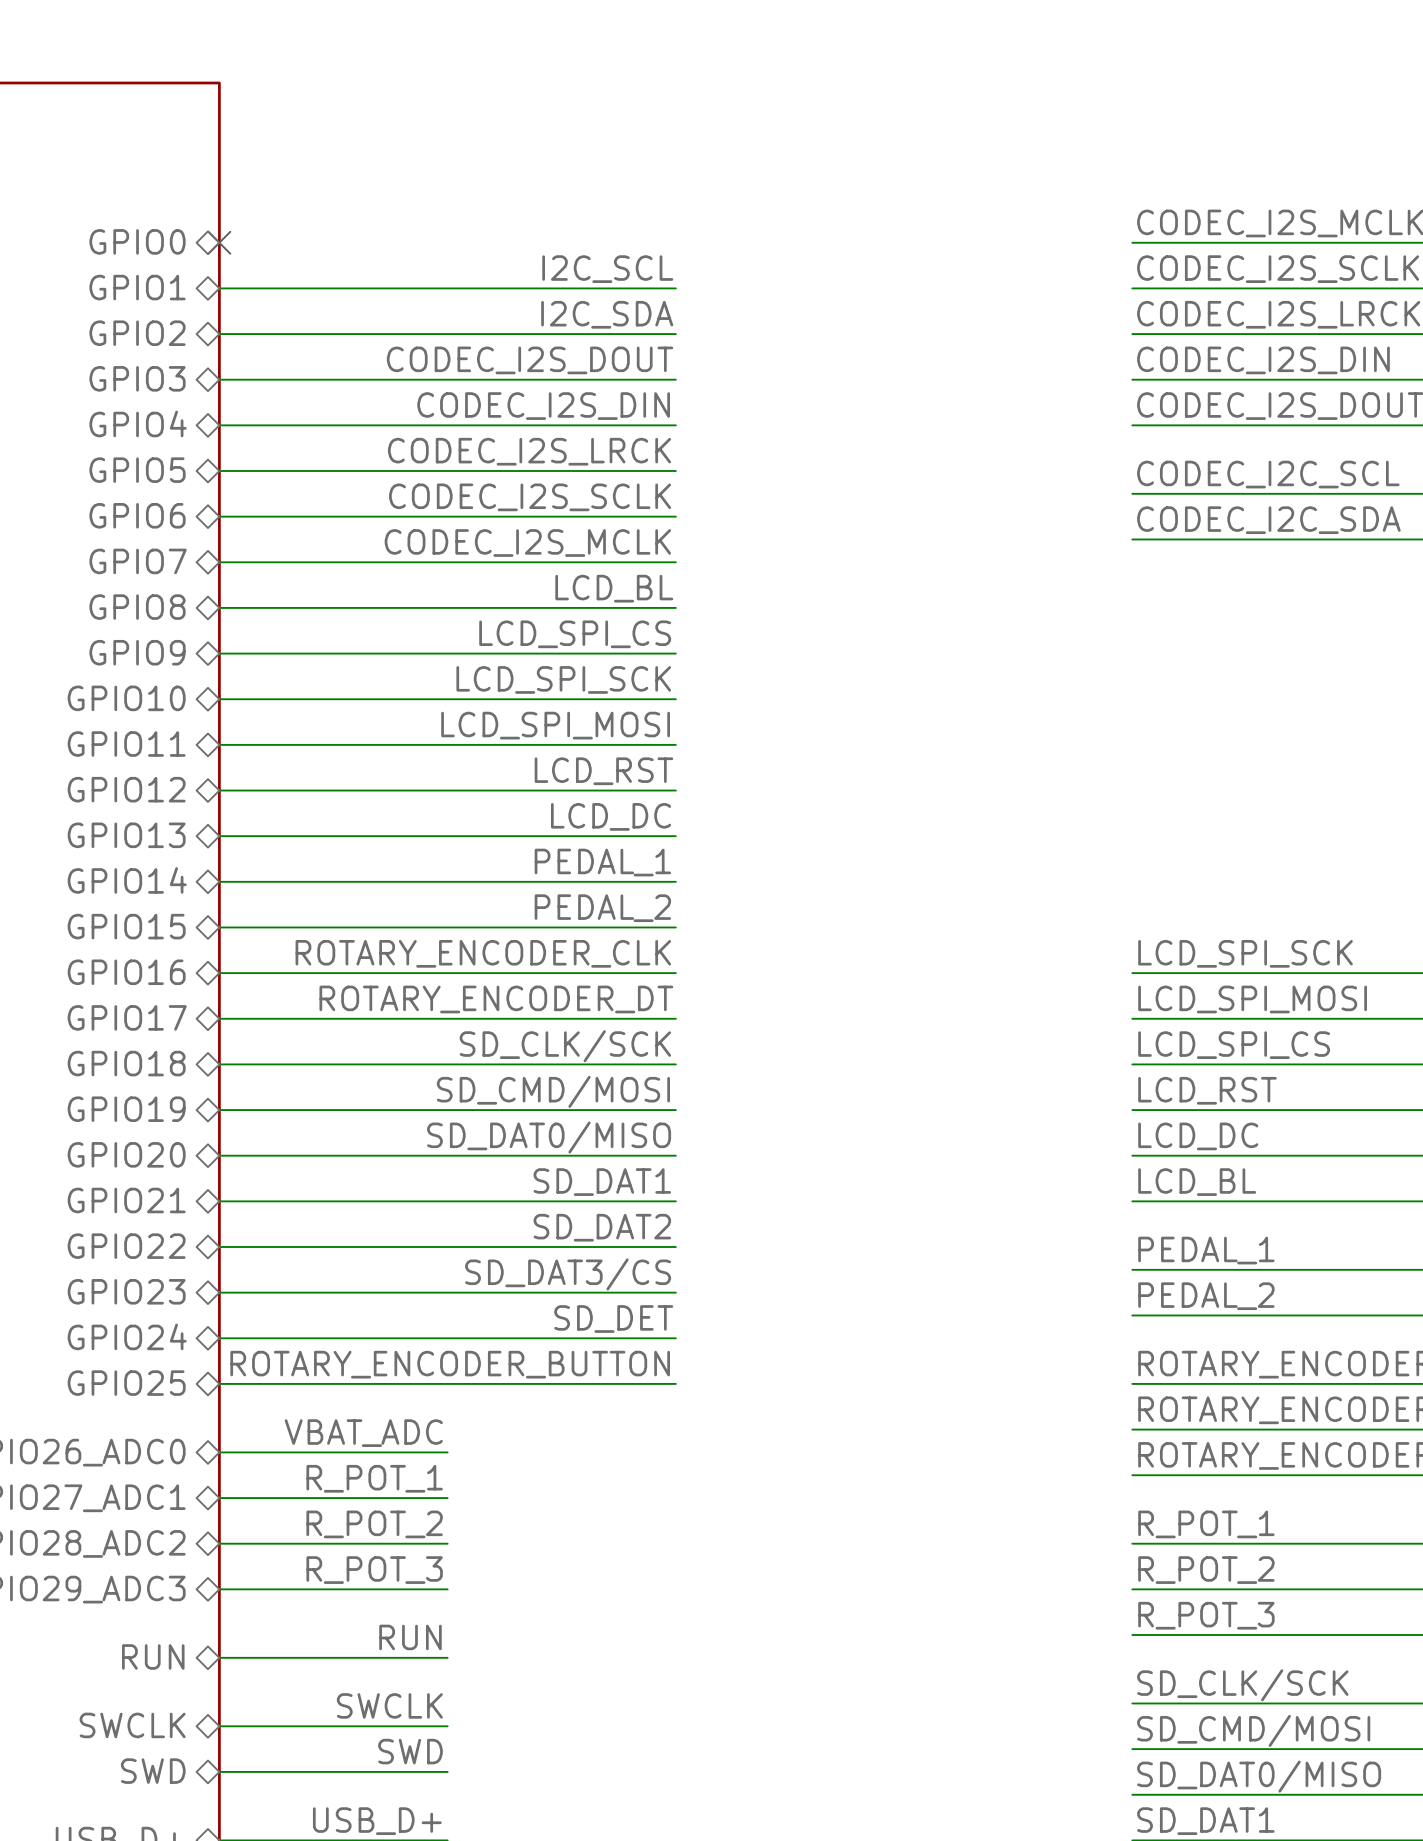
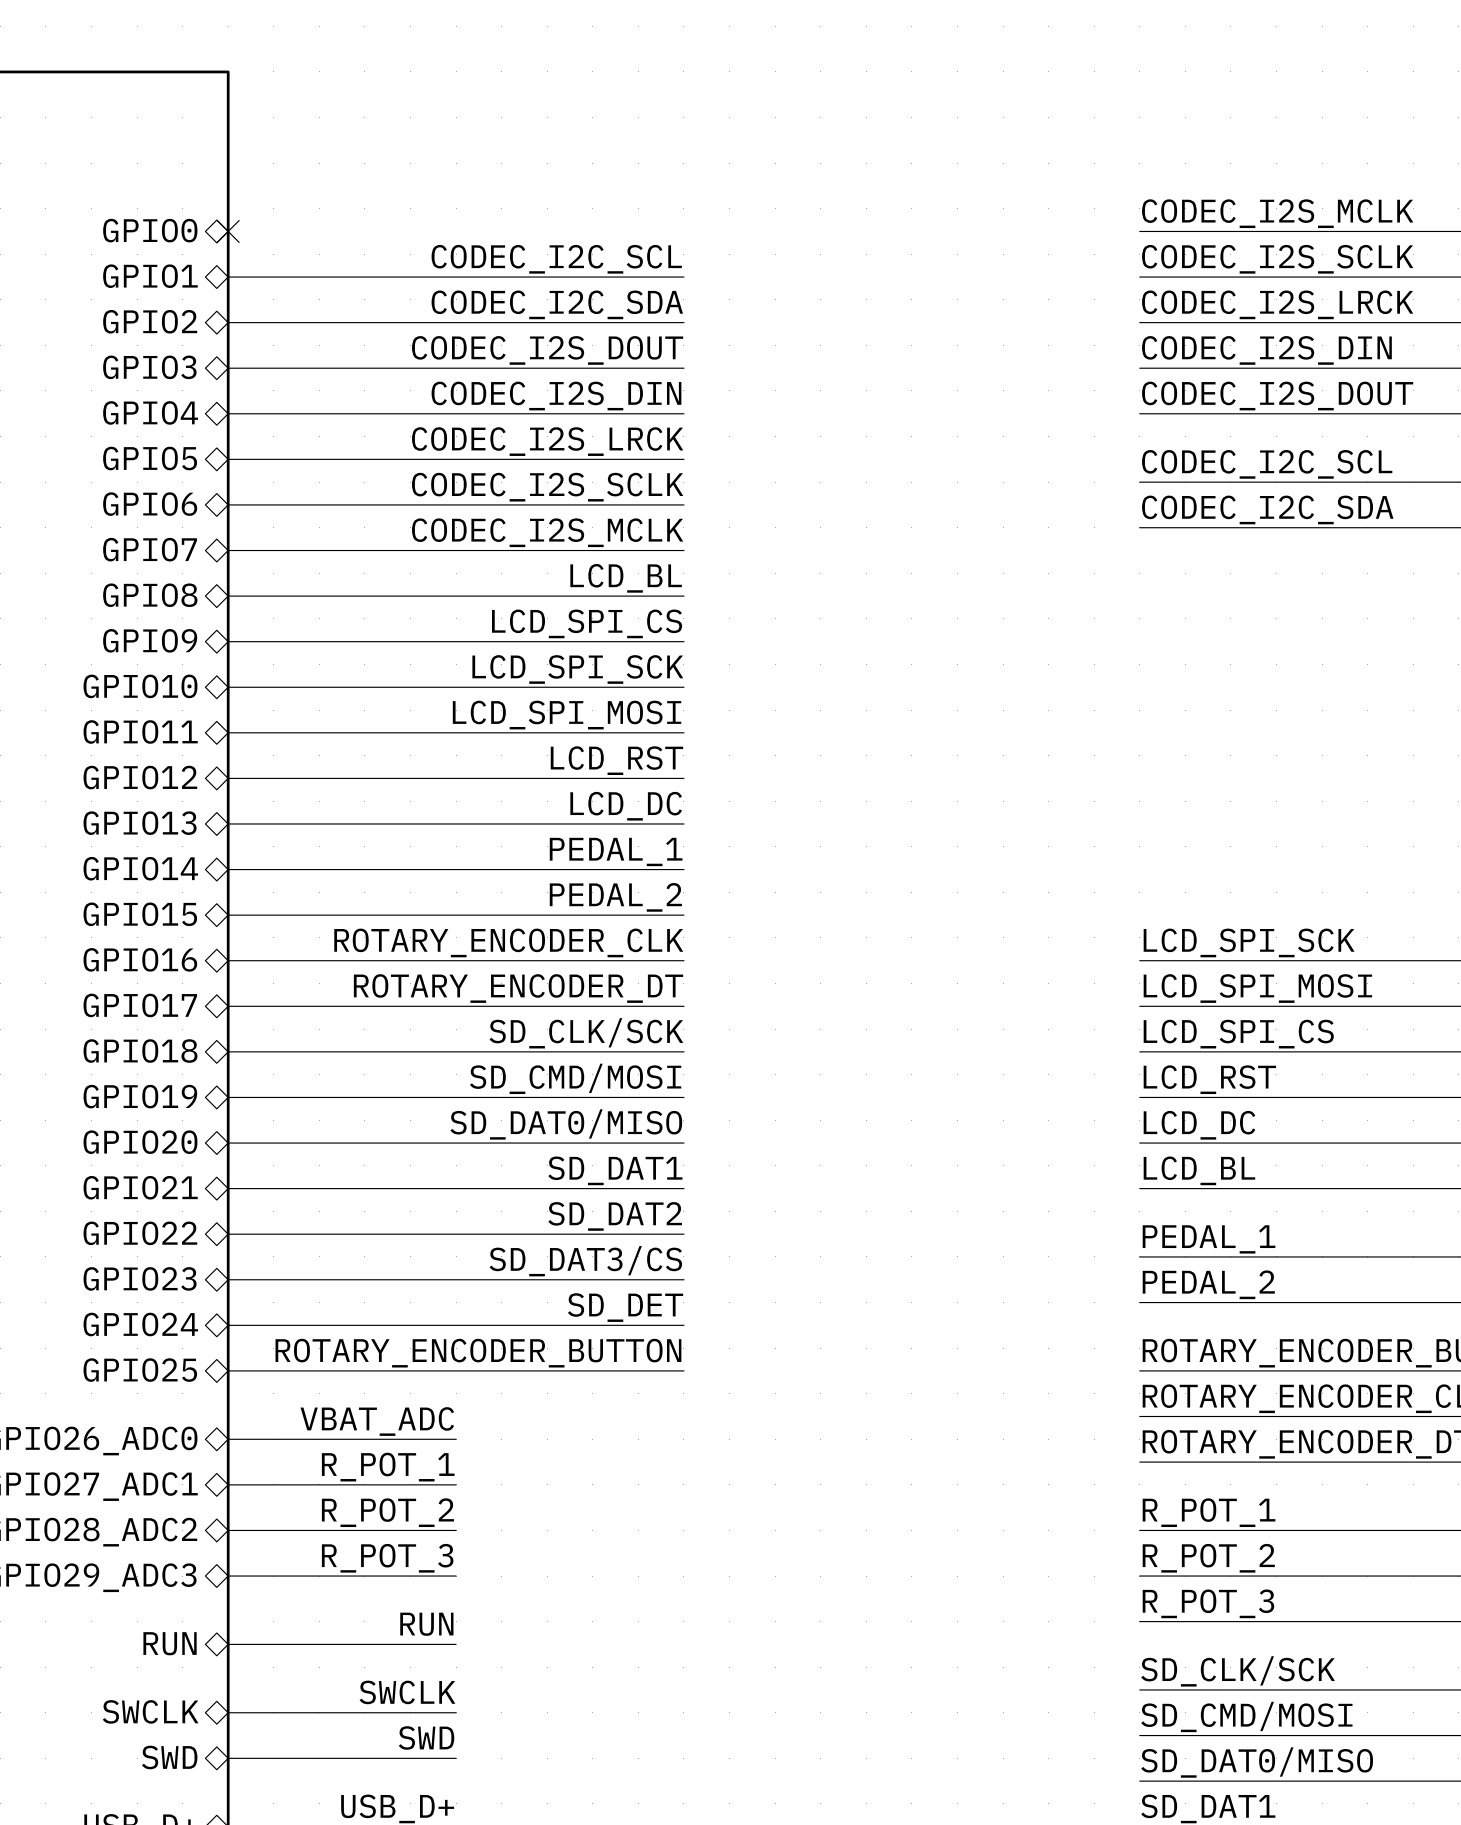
label: I2C_SCL (607, 269) -> CODEC_I2C_SCL (556, 259)
label: I2C_SDA (607, 314) -> CODEC_I2C_SDA (557, 304)

